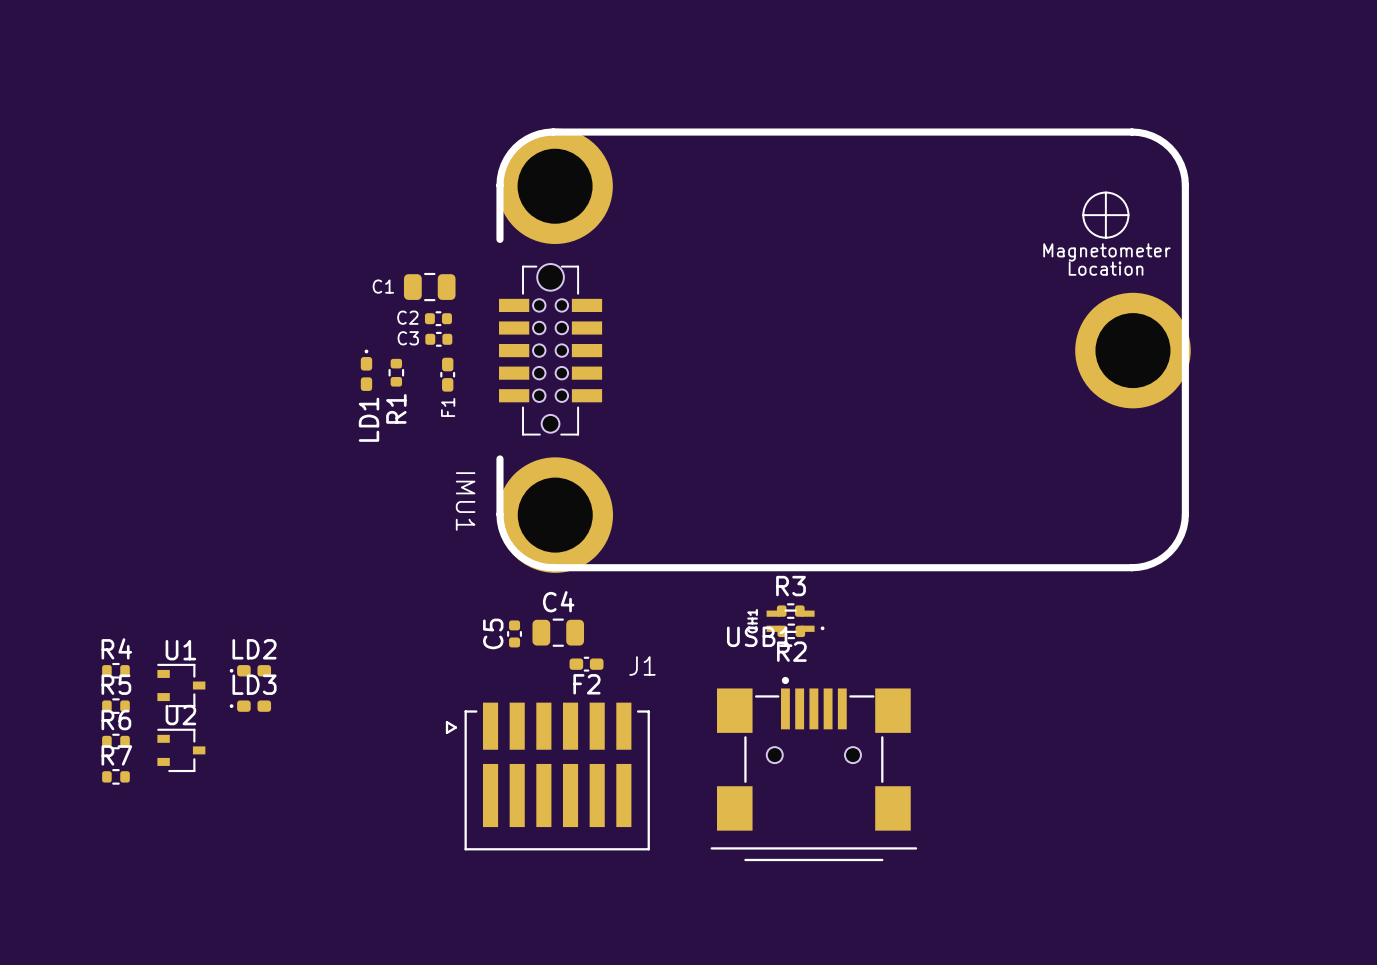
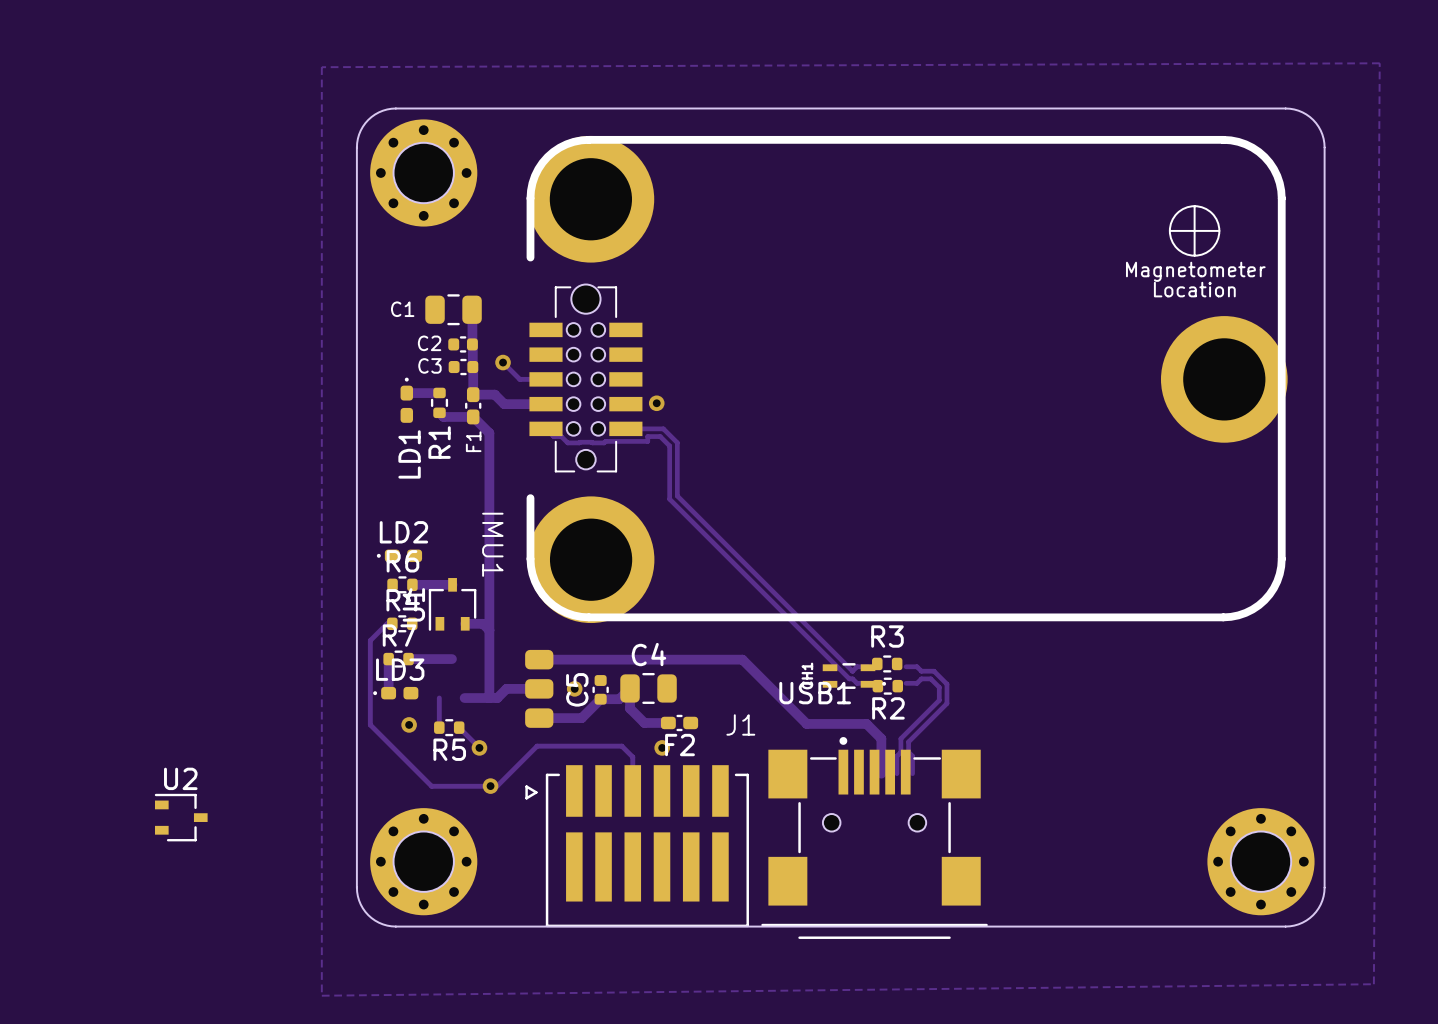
zone outline: none -> (1379, 63) (1373, 984) (321, 995) (321, 67) (1379, 63)
board edge: none -> (395, 108) (1285, 108) (1298, 110) (1309, 116) (1320, 130) (1324, 147) (1324, 887) (1322, 900) (1316, 911) (1302, 922) (1285, 926) (395, 926) (383, 924) (371, 918) (360, 904) (356, 887) (356, 147) (359, 134) (368, 119) (383, 110) (395, 108)
part: none -> (423, 172)
track: none -> (472, 309) (473, 394) (494, 394) (504, 404) (546, 404)
track: none -> (503, 362) (519, 379) (546, 379)
via: none -> (503, 362)
track: none -> (406, 393) (439, 393)
LD1 position: (366, 370) -> (406, 400)
R1 position: (396, 372) -> (439, 402)
via: none -> (656, 403)
track: none -> (439, 412) (443, 416) (473, 416) (489, 433) (488, 698)
track: none -> (546, 428) (553, 436) (561, 436) (567, 442) (647, 441) (647, 436) (660, 436) (669, 445) (669, 499) (849, 678) (852, 678) (857, 683) (868, 683)
track: none -> (625, 428) (663, 428) (677, 442) (677, 495) (852, 671) (857, 666) (868, 666)
track: none -> (412, 584) (452, 584)
track: none -> (392, 623) (387, 623) (370, 640) (370, 724) (431, 786) (490, 786)
track: none -> (465, 623) (482, 623) (489, 630)
track: none -> (388, 659) (388, 693)
track: none -> (408, 659) (451, 659)
track: none -> (539, 659) (742, 659) (806, 723) (866, 723) (881, 738) (881, 773)
R3 position: (790, 611) -> (887, 663)
track: none -> (906, 666) (916, 666) (921, 671) (934, 671) (946, 684) (946, 703) (908, 741) (908, 752) (912, 756) (912, 773)
track: none -> (906, 683) (916, 683) (921, 678) (930, 678) (939, 687) (939, 700) (900, 738) (900, 752) (896, 756) (896, 773)
R2 position: (791, 631) -> (887, 686)
track: none -> (539, 688) (506, 688) (497, 698) (464, 698)
part: none -> (539, 688)
via: none -> (574, 688)
C4 position: (558, 632) -> (648, 688)
C5 position: (514, 633) -> (600, 689)
track: none -> (439, 698) (439, 727)
track: none -> (539, 718) (581, 718) (600, 699) (619, 699) (630, 688) (630, 708) (644, 722) (668, 722)
F2 position: (586, 664) -> (679, 722)
via: none -> (409, 724)
track: none -> (459, 727) (479, 747)
R4 position: (115, 670) -> (402, 623)
LD2 position: (250, 670) -> (399, 555)
R5 name position: R5 (116, 684) -> R5 (449, 749)
U1 rotation: 0° (181, 685) -> 90° counterclockwise (452, 604)
U1 position: (181, 685) -> (452, 604)
via: none -> (479, 747)
via: none -> (662, 747)
R5 position: (115, 706) -> (449, 727)
LD3 position: (250, 706) -> (395, 693)
track: none -> (490, 786) (496, 786) (537, 746) (621, 746) (632, 757) (632, 790)
via: none -> (490, 786)
R6 position: (115, 741) -> (402, 584)
R7 position: (115, 776) -> (398, 659)
J1 position: (547, 776) -> (637, 846)
part: none -> (423, 861)
part: none -> (1260, 861)

